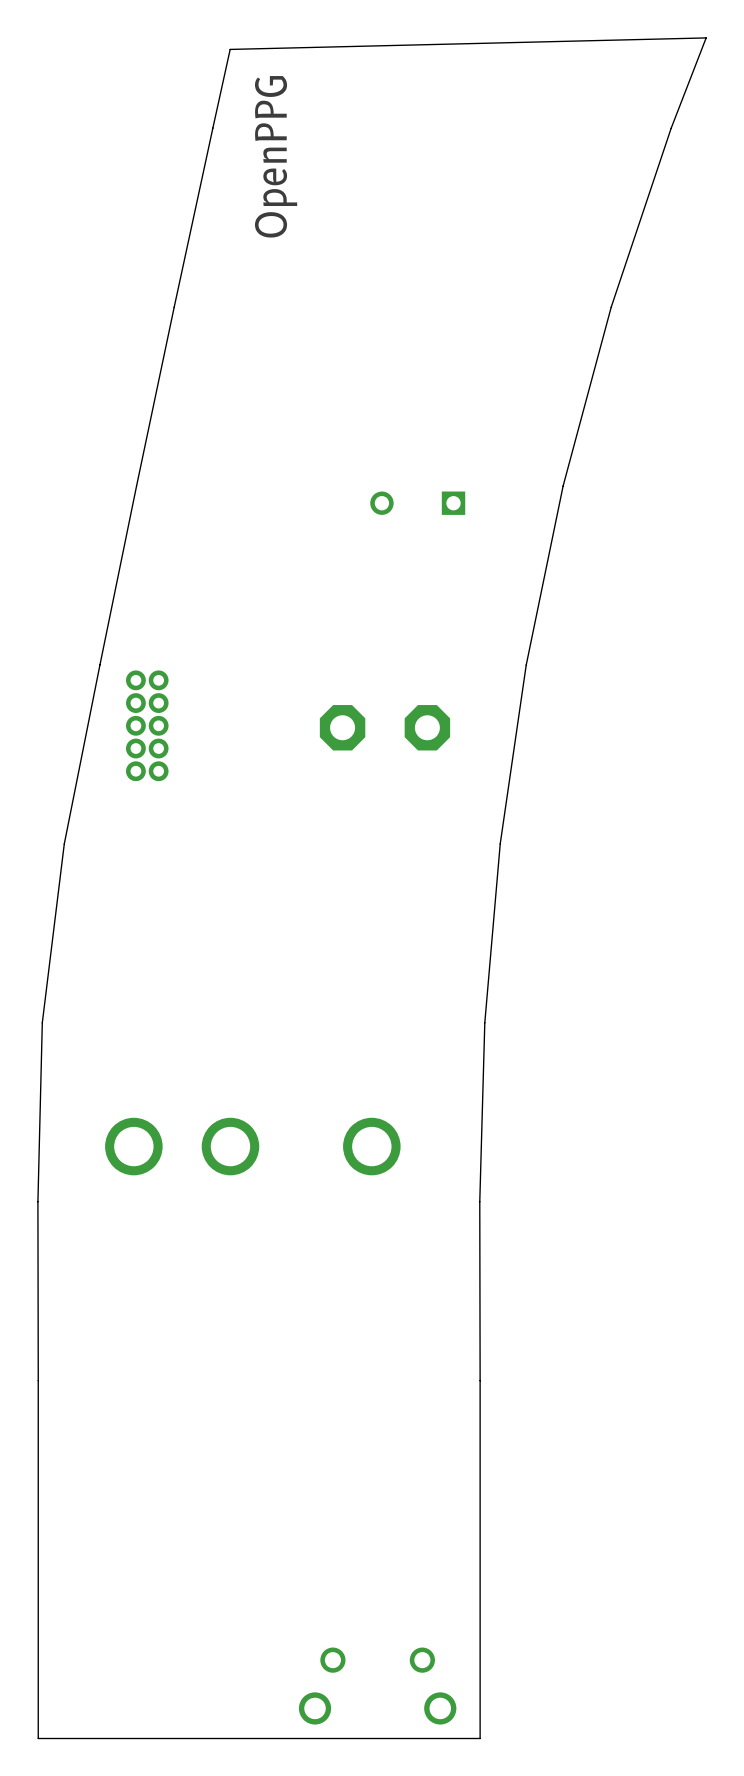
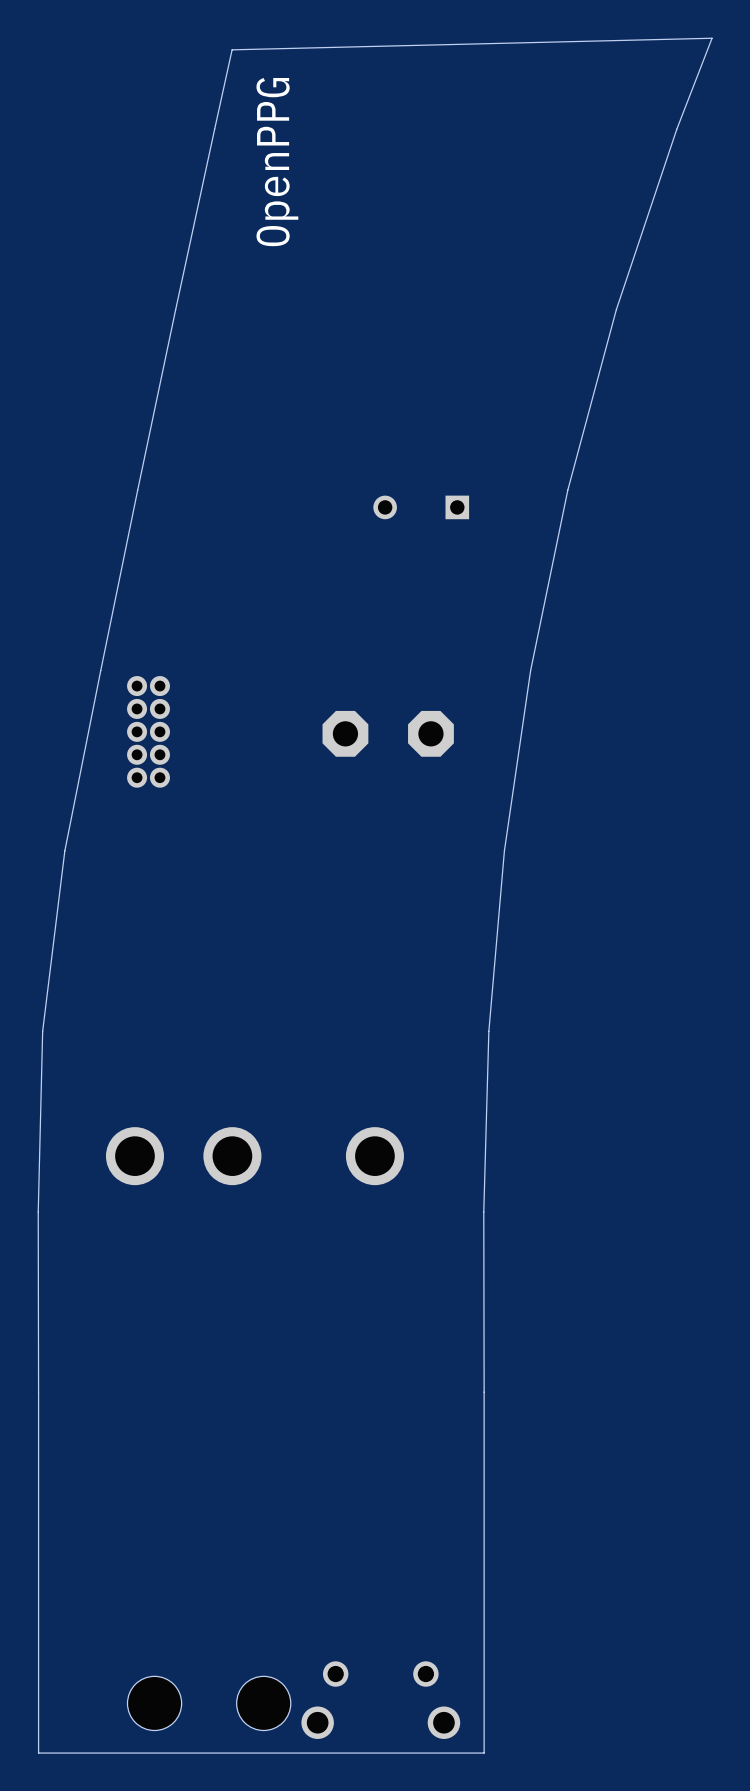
hole: none -> (154, 1703)
hole: none -> (263, 1703)

